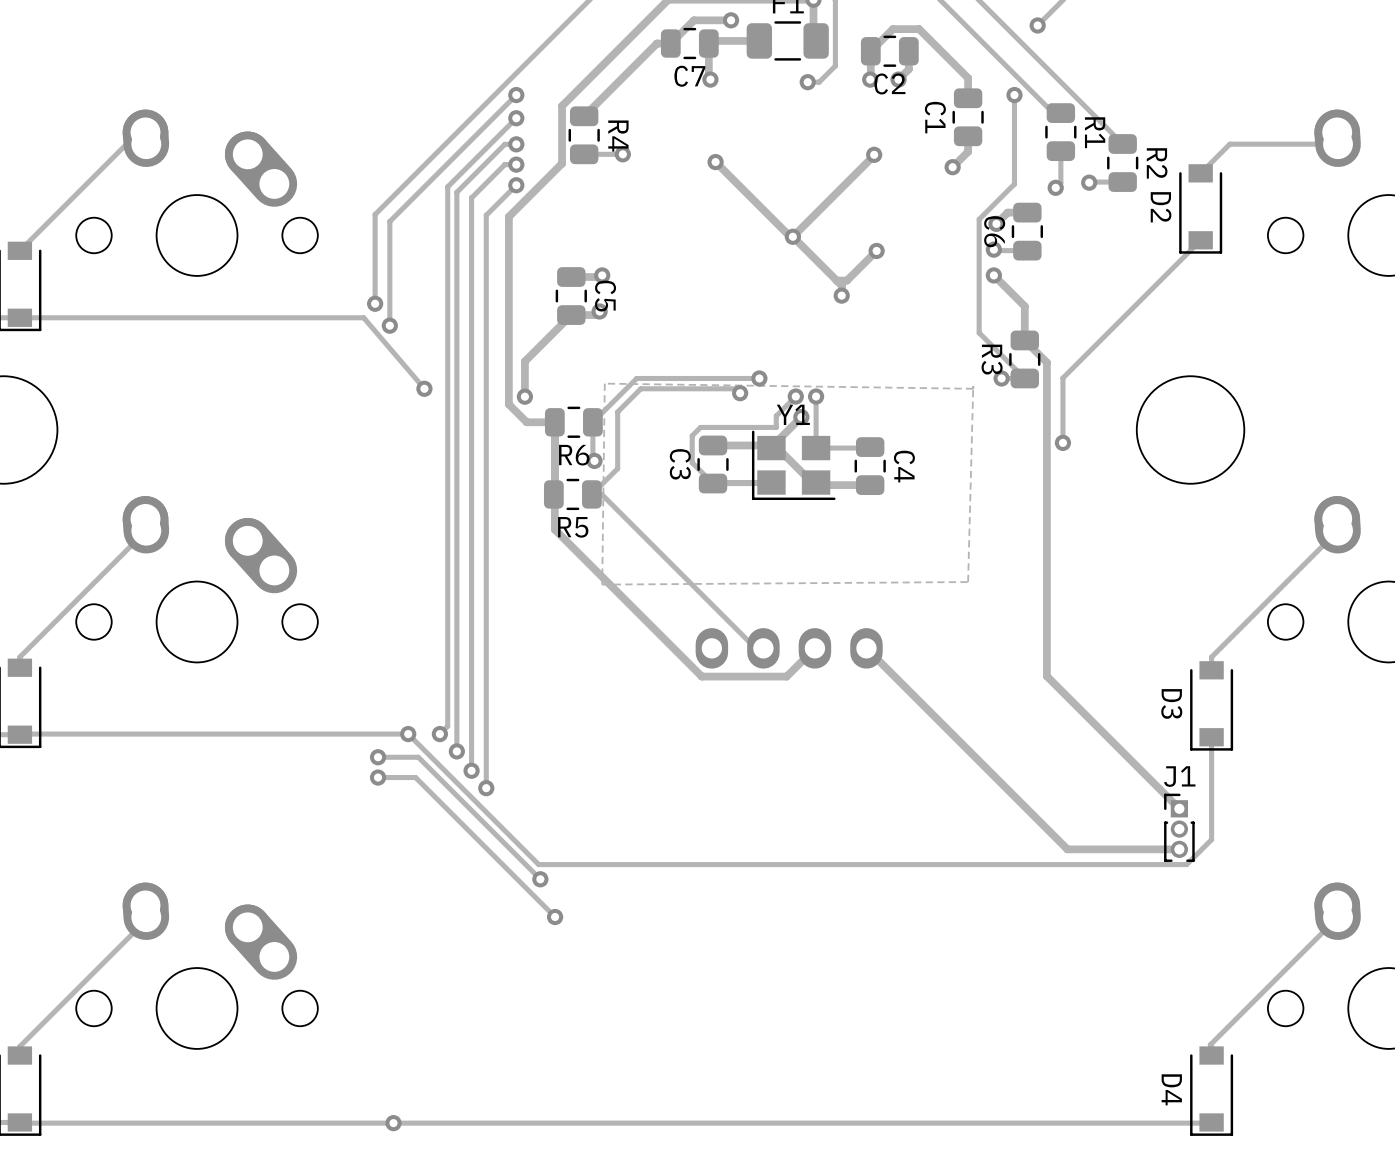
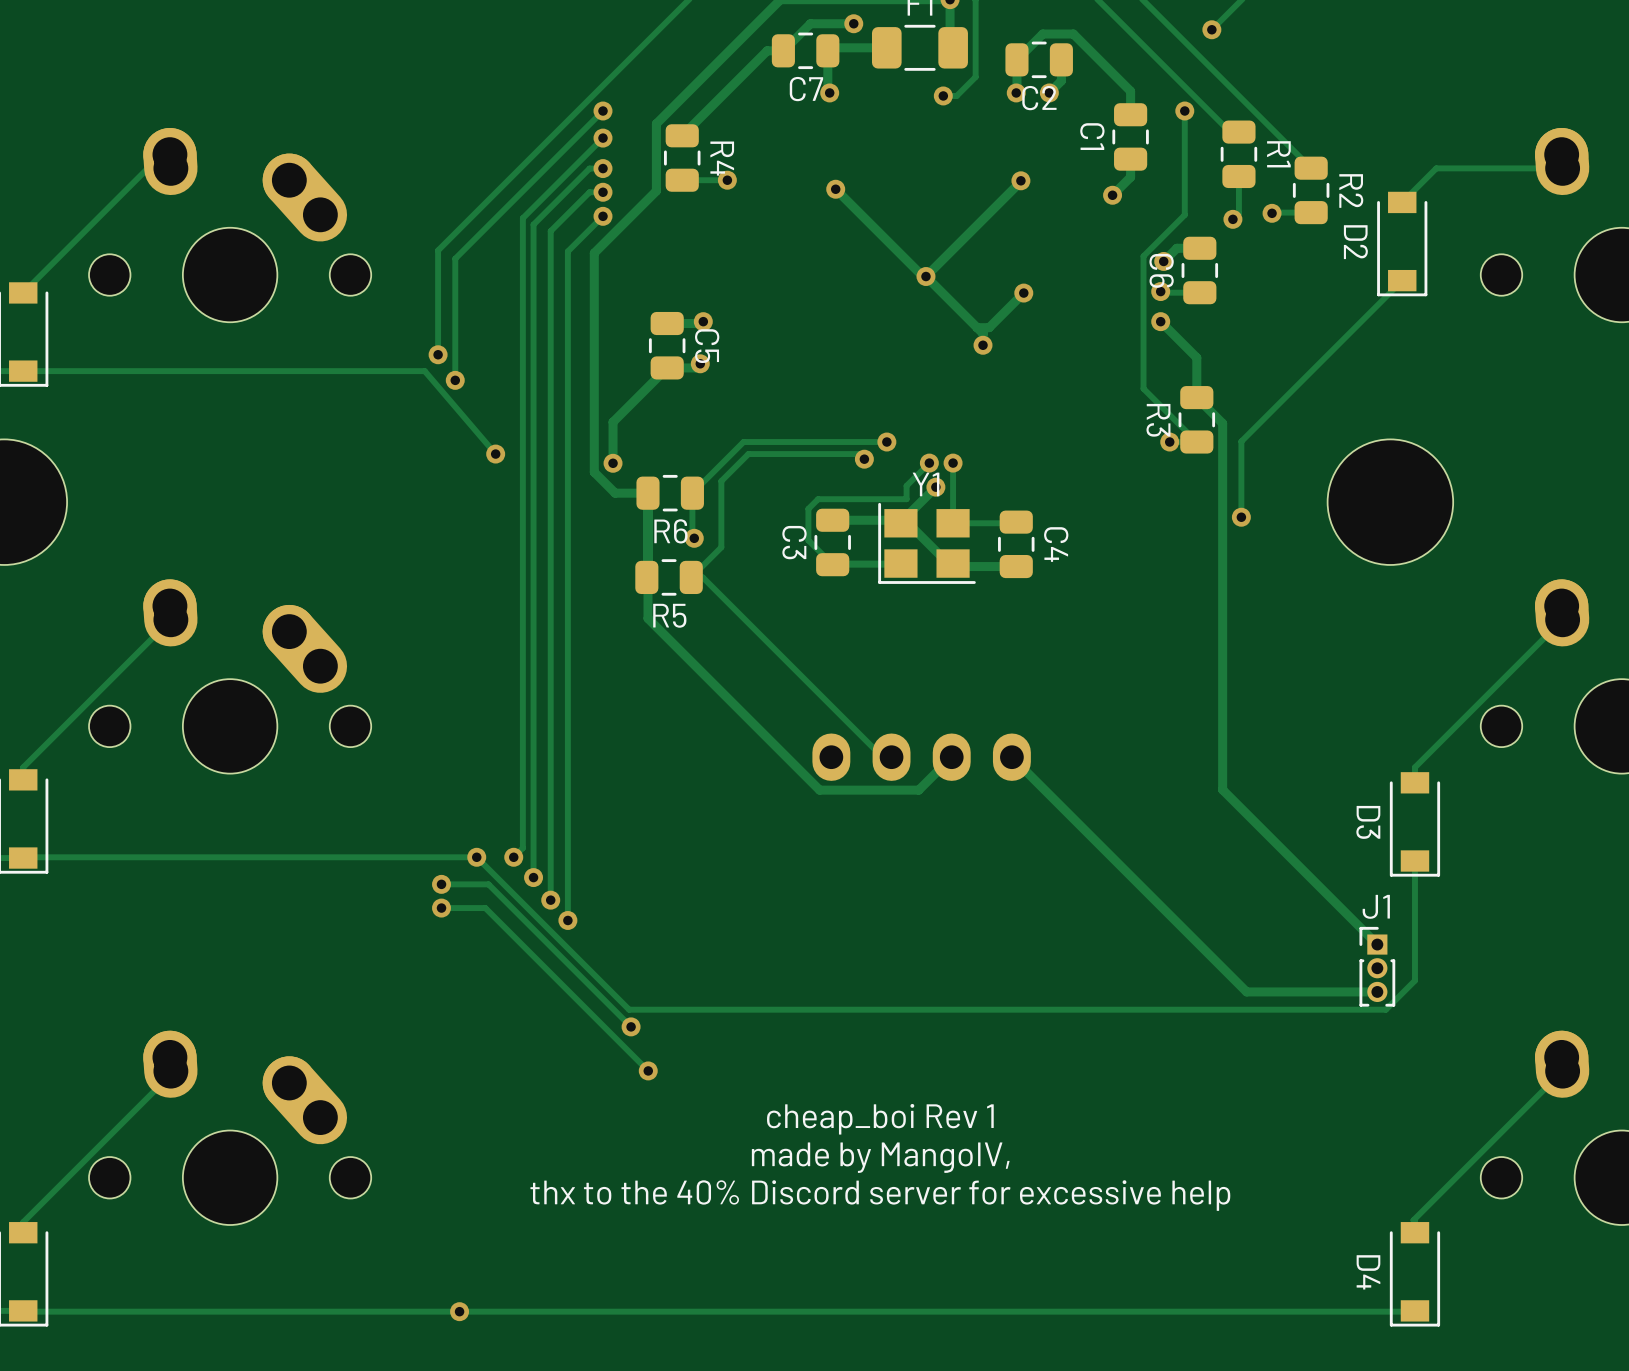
zone outline: (604, 383) (973, 388) (973, 386) (968, 582) (602, 584) (604, 383) -> none
text: none -> cheap_boi Rev 1 (880, 1119)
text: none -> made by MangoIV, (880, 1157)
text: none -> thx to the 40% Discord server for excessive help (880, 1195)

